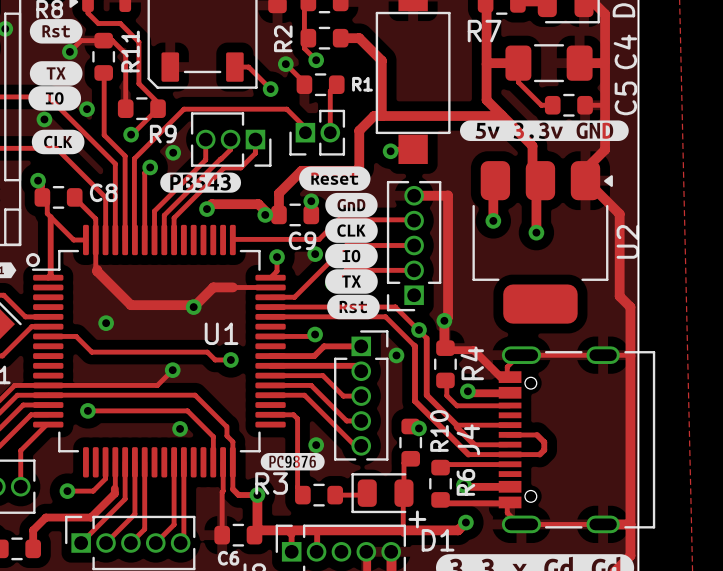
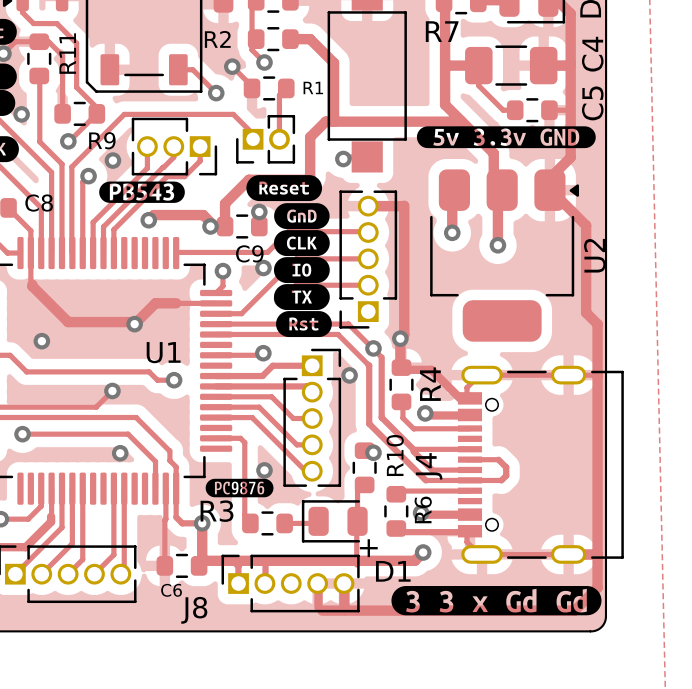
R2 name rotation: 0° (283, 38) -> 90° clockwise (217, 39)

